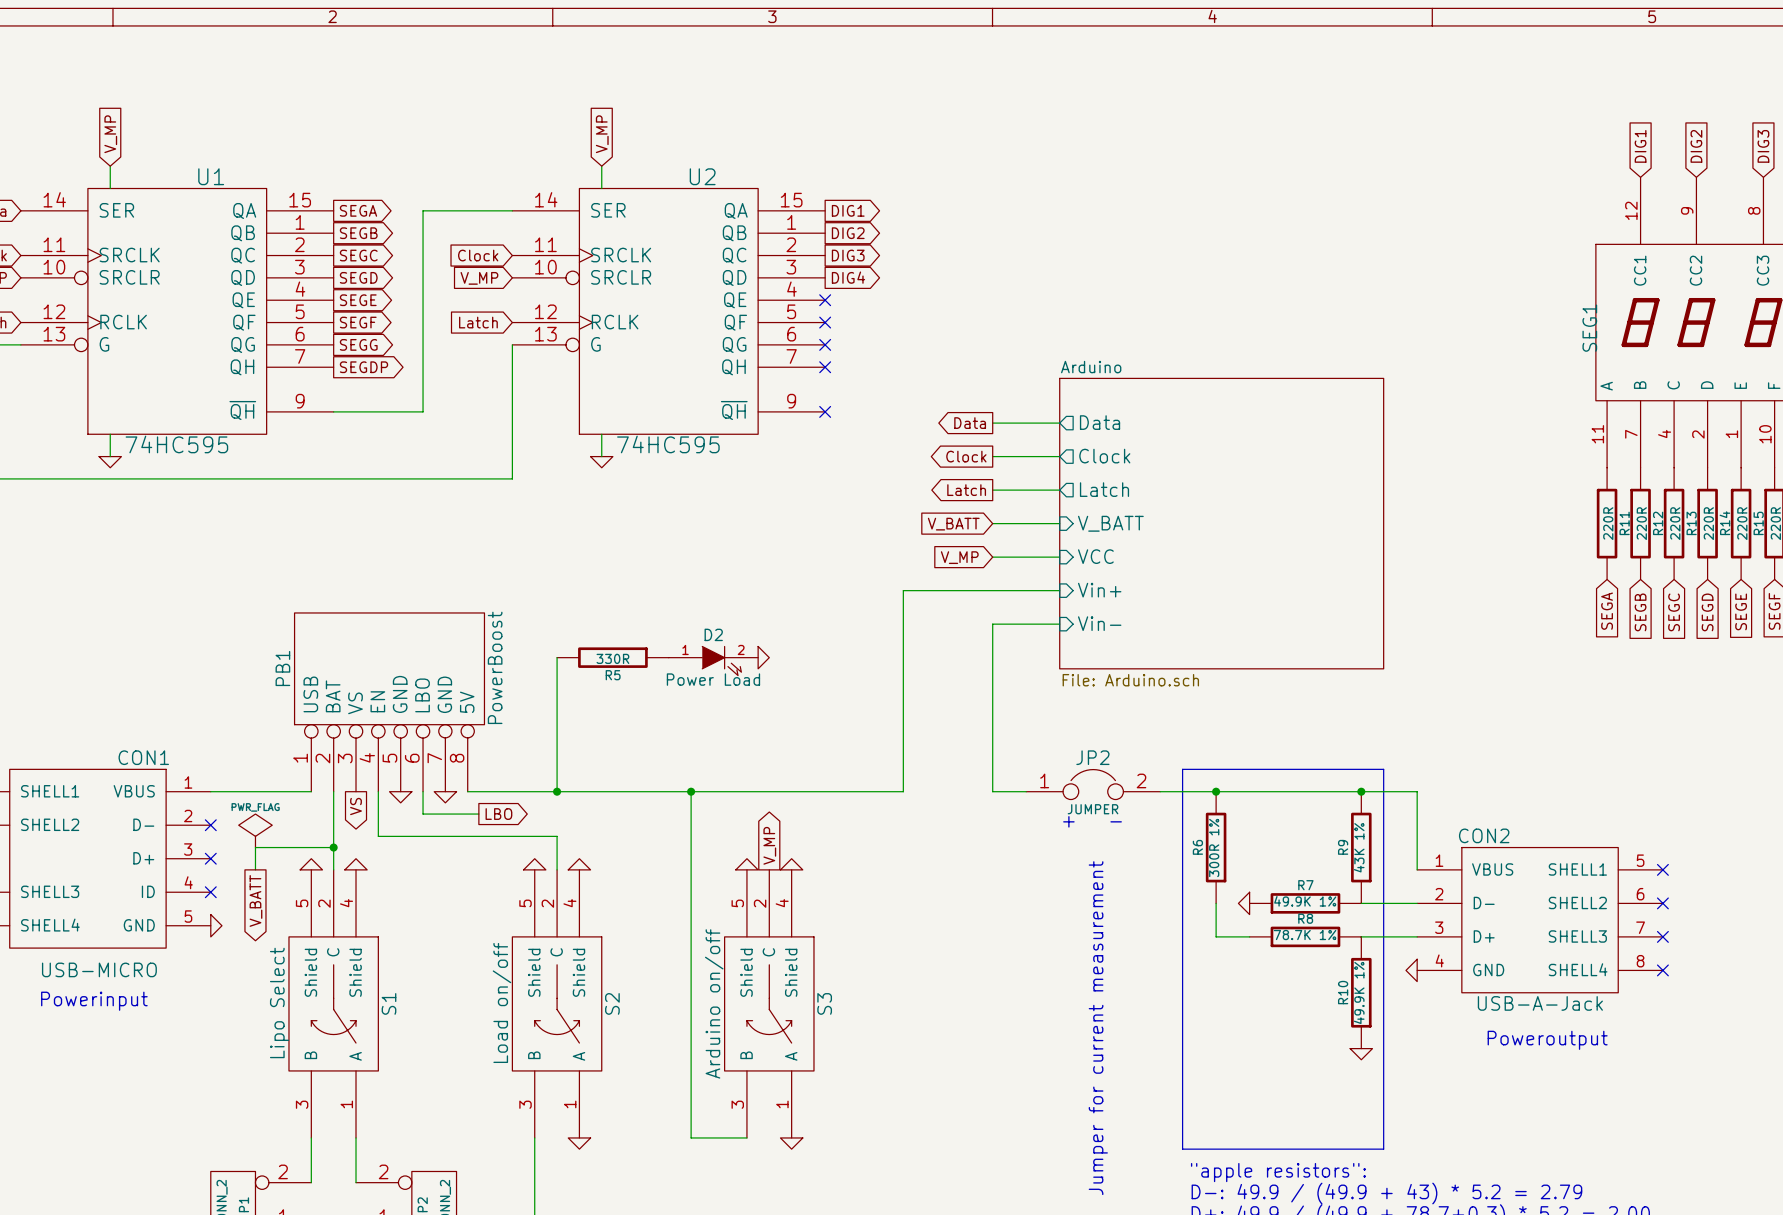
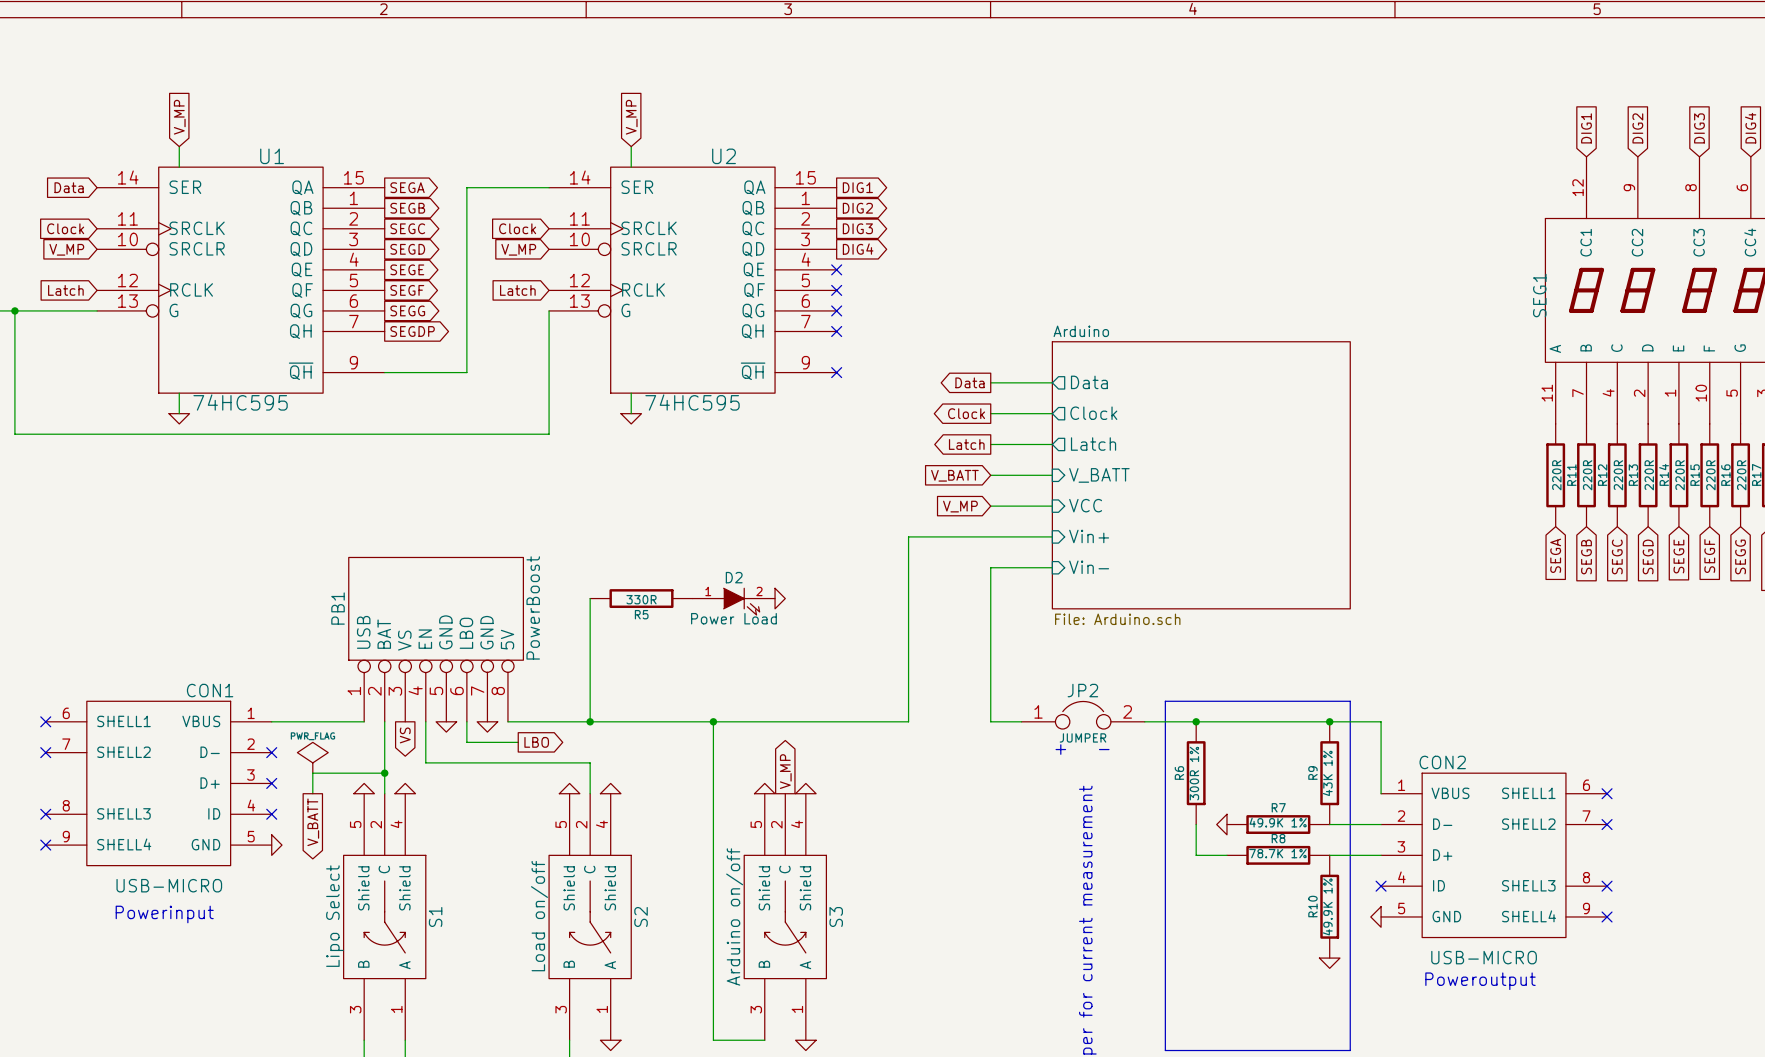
CON2 symbol: [1417, 847, 1663, 993] -> [1381, 773, 1608, 938]
no-connect mark: (1662, 936) -> none
power symbol position: (1411, 970) -> (1375, 916)
no-connect mark: none -> (1381, 886)
CON2 value: USB-A-Jack (1540, 1003) -> USB-MICRO (1484, 957)
no-connect mark: none -> (1607, 916)
text position: Poweroutput (1547, 1040) -> Poweroutput (1480, 981)

